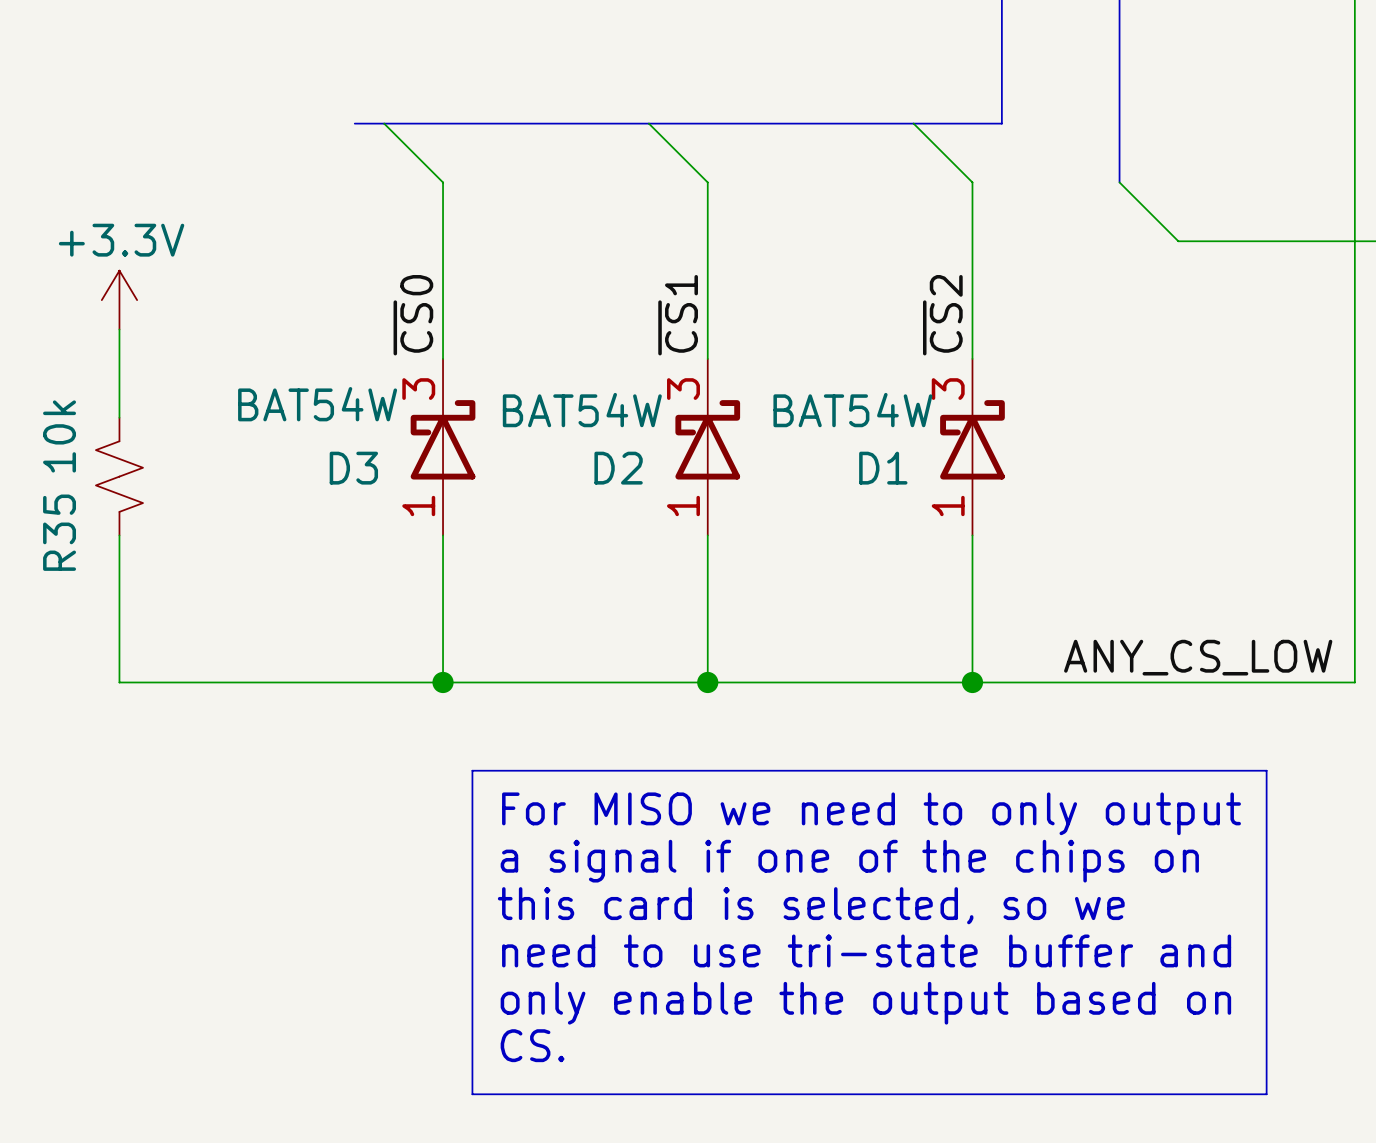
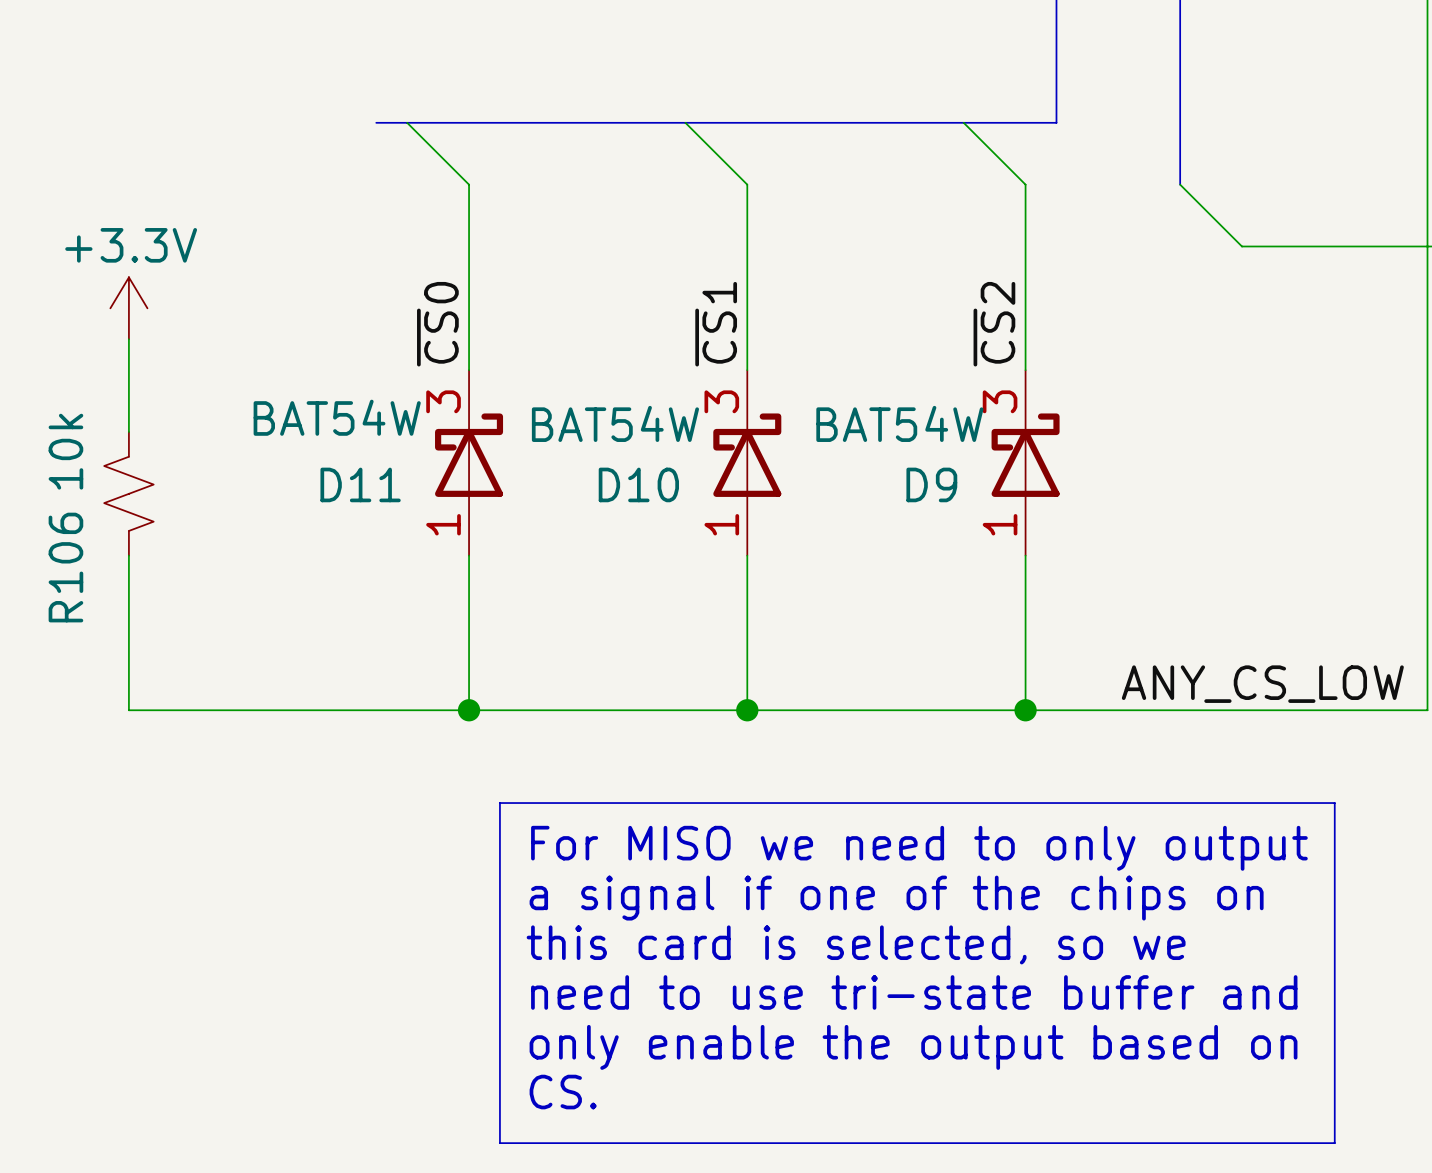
D3 name: D3 (353, 468) -> D11 (360, 484)
D2 name: D2 (618, 468) -> D10 (638, 484)
D1 name: D1 (883, 468) -> D9 (931, 484)
R35 name: R35 (59, 532) -> R106 (65, 567)

